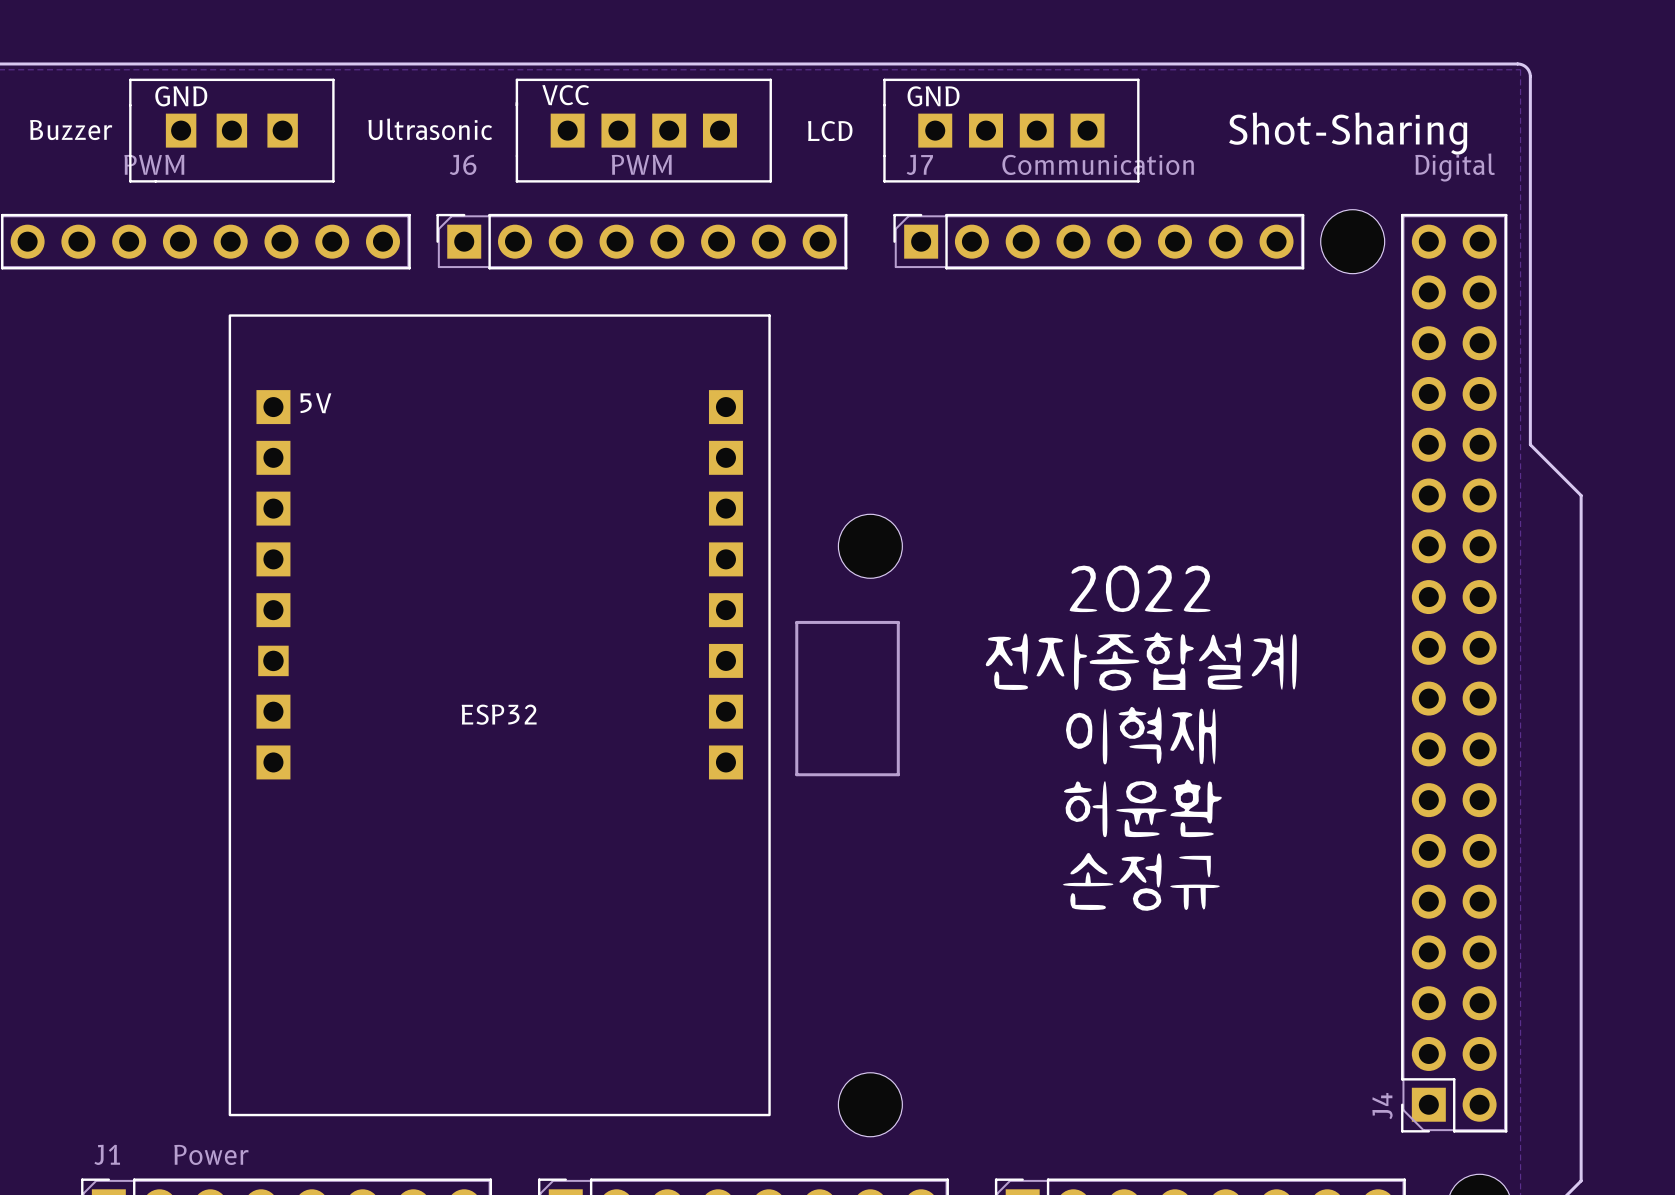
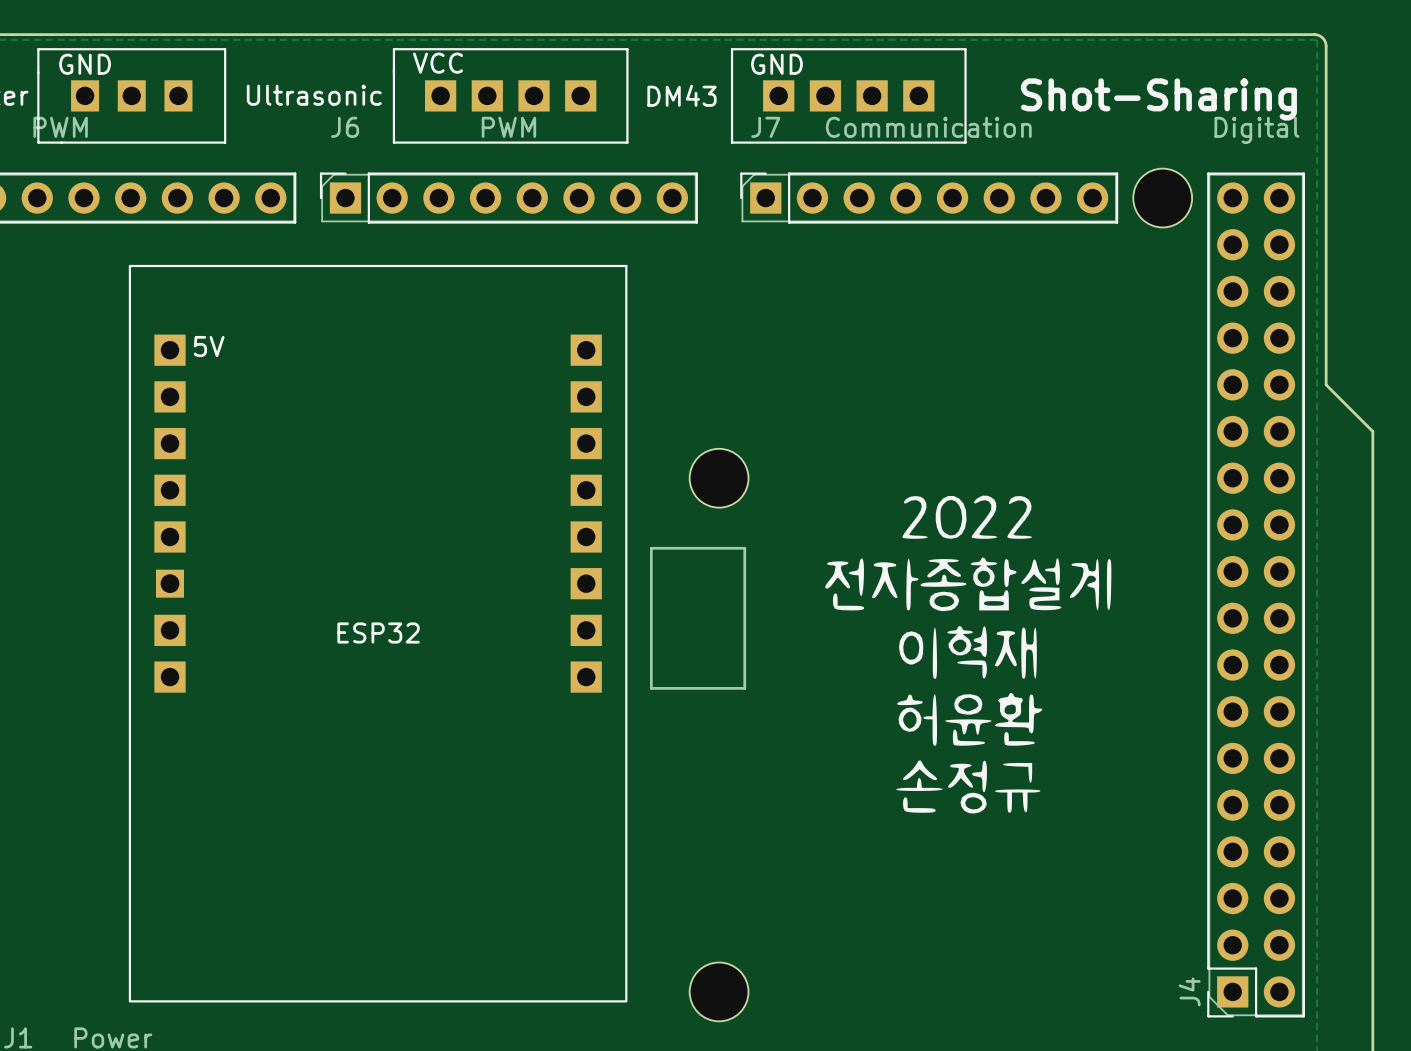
part value: LCD (830, 131) -> DM43 (682, 95)

